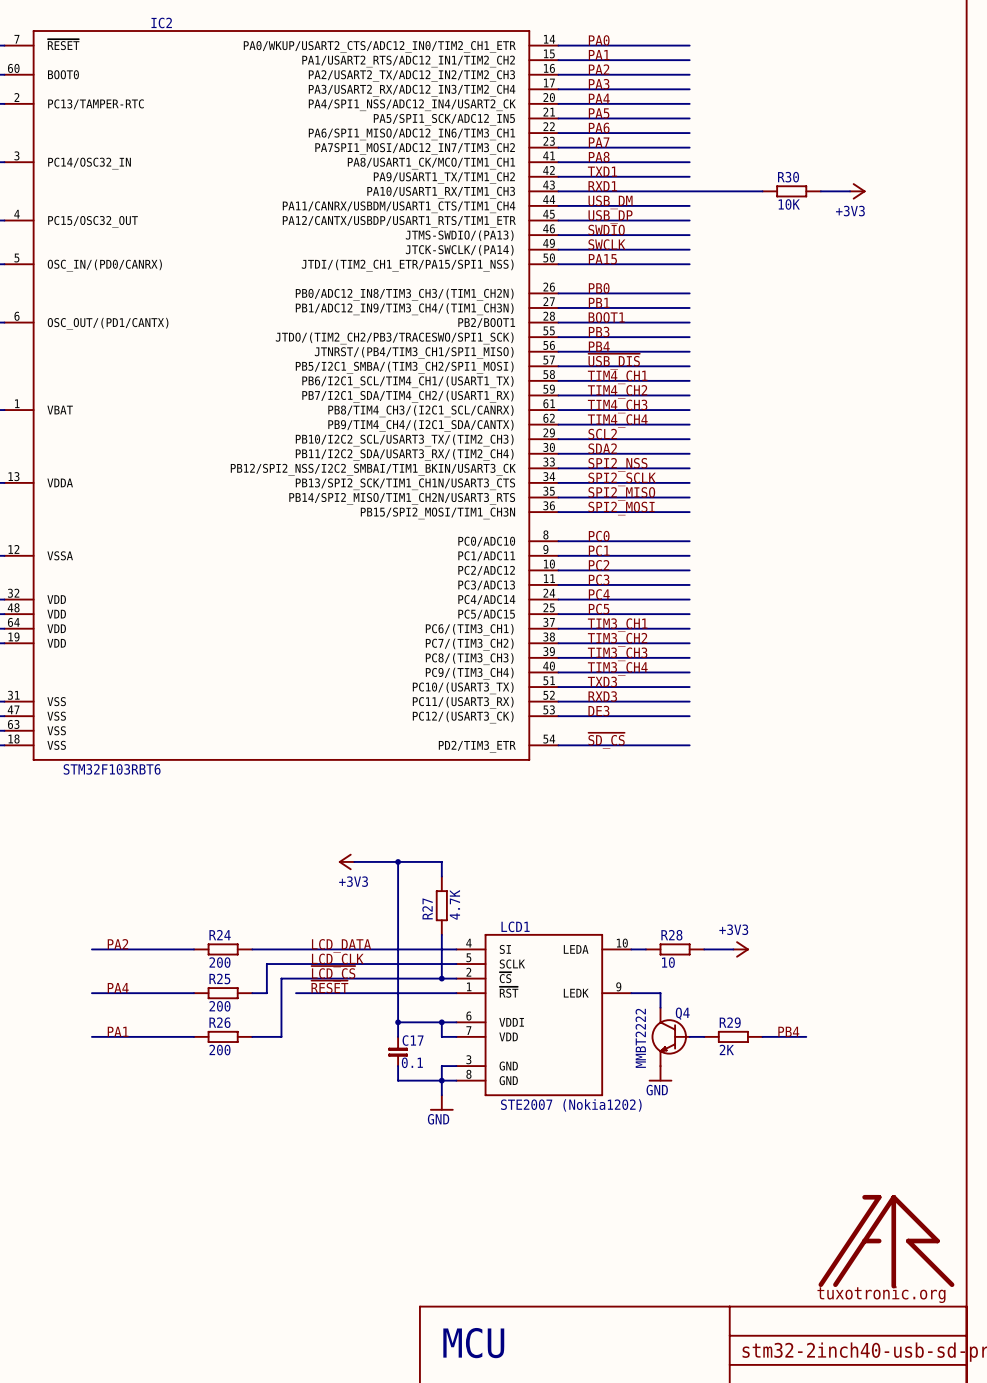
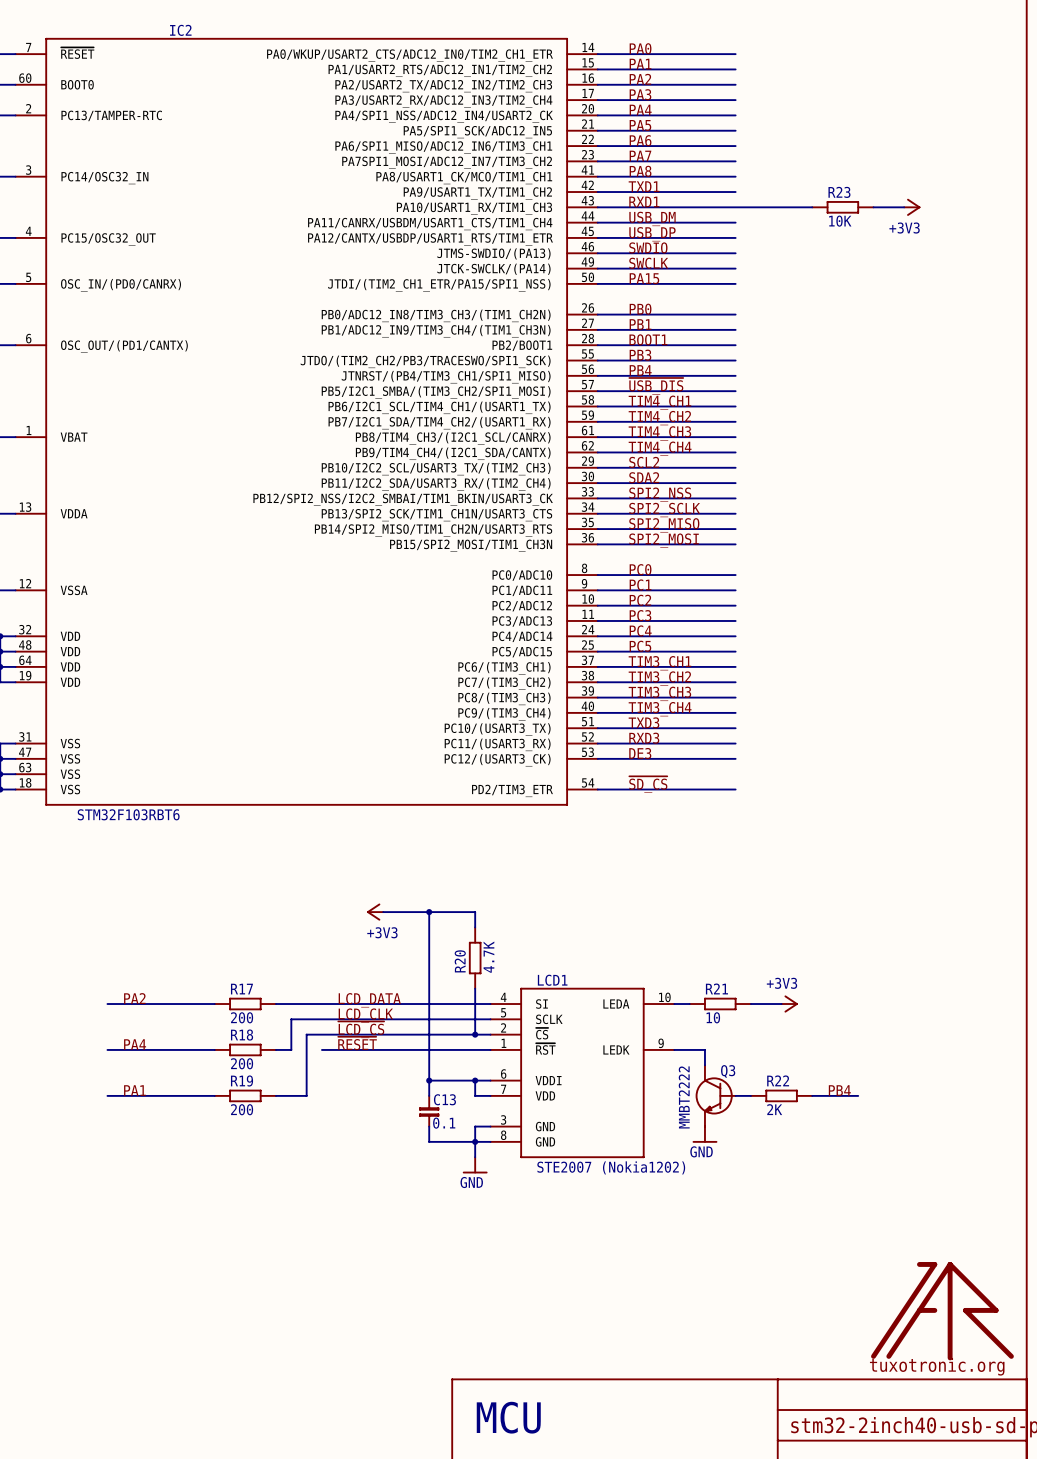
R30 name: R30 (788, 177) -> R23 (839, 192)
R27 name: R27 (427, 908) -> R20 (460, 961)
R24 name: R24 (220, 935) -> R17 (241, 989)
R28 name: R28 (671, 935) -> R21 (716, 988)
R25 name: R25 (219, 978) -> R18 (242, 1035)
Q4 name: Q4 (682, 1013) -> Q3 (728, 1071)
R26 name: R26 (219, 1022) -> R19 (242, 1081)
R29 name: R29 (730, 1022) -> R22 (778, 1080)
C17 name: C17 (413, 1040) -> C13 (444, 1099)

